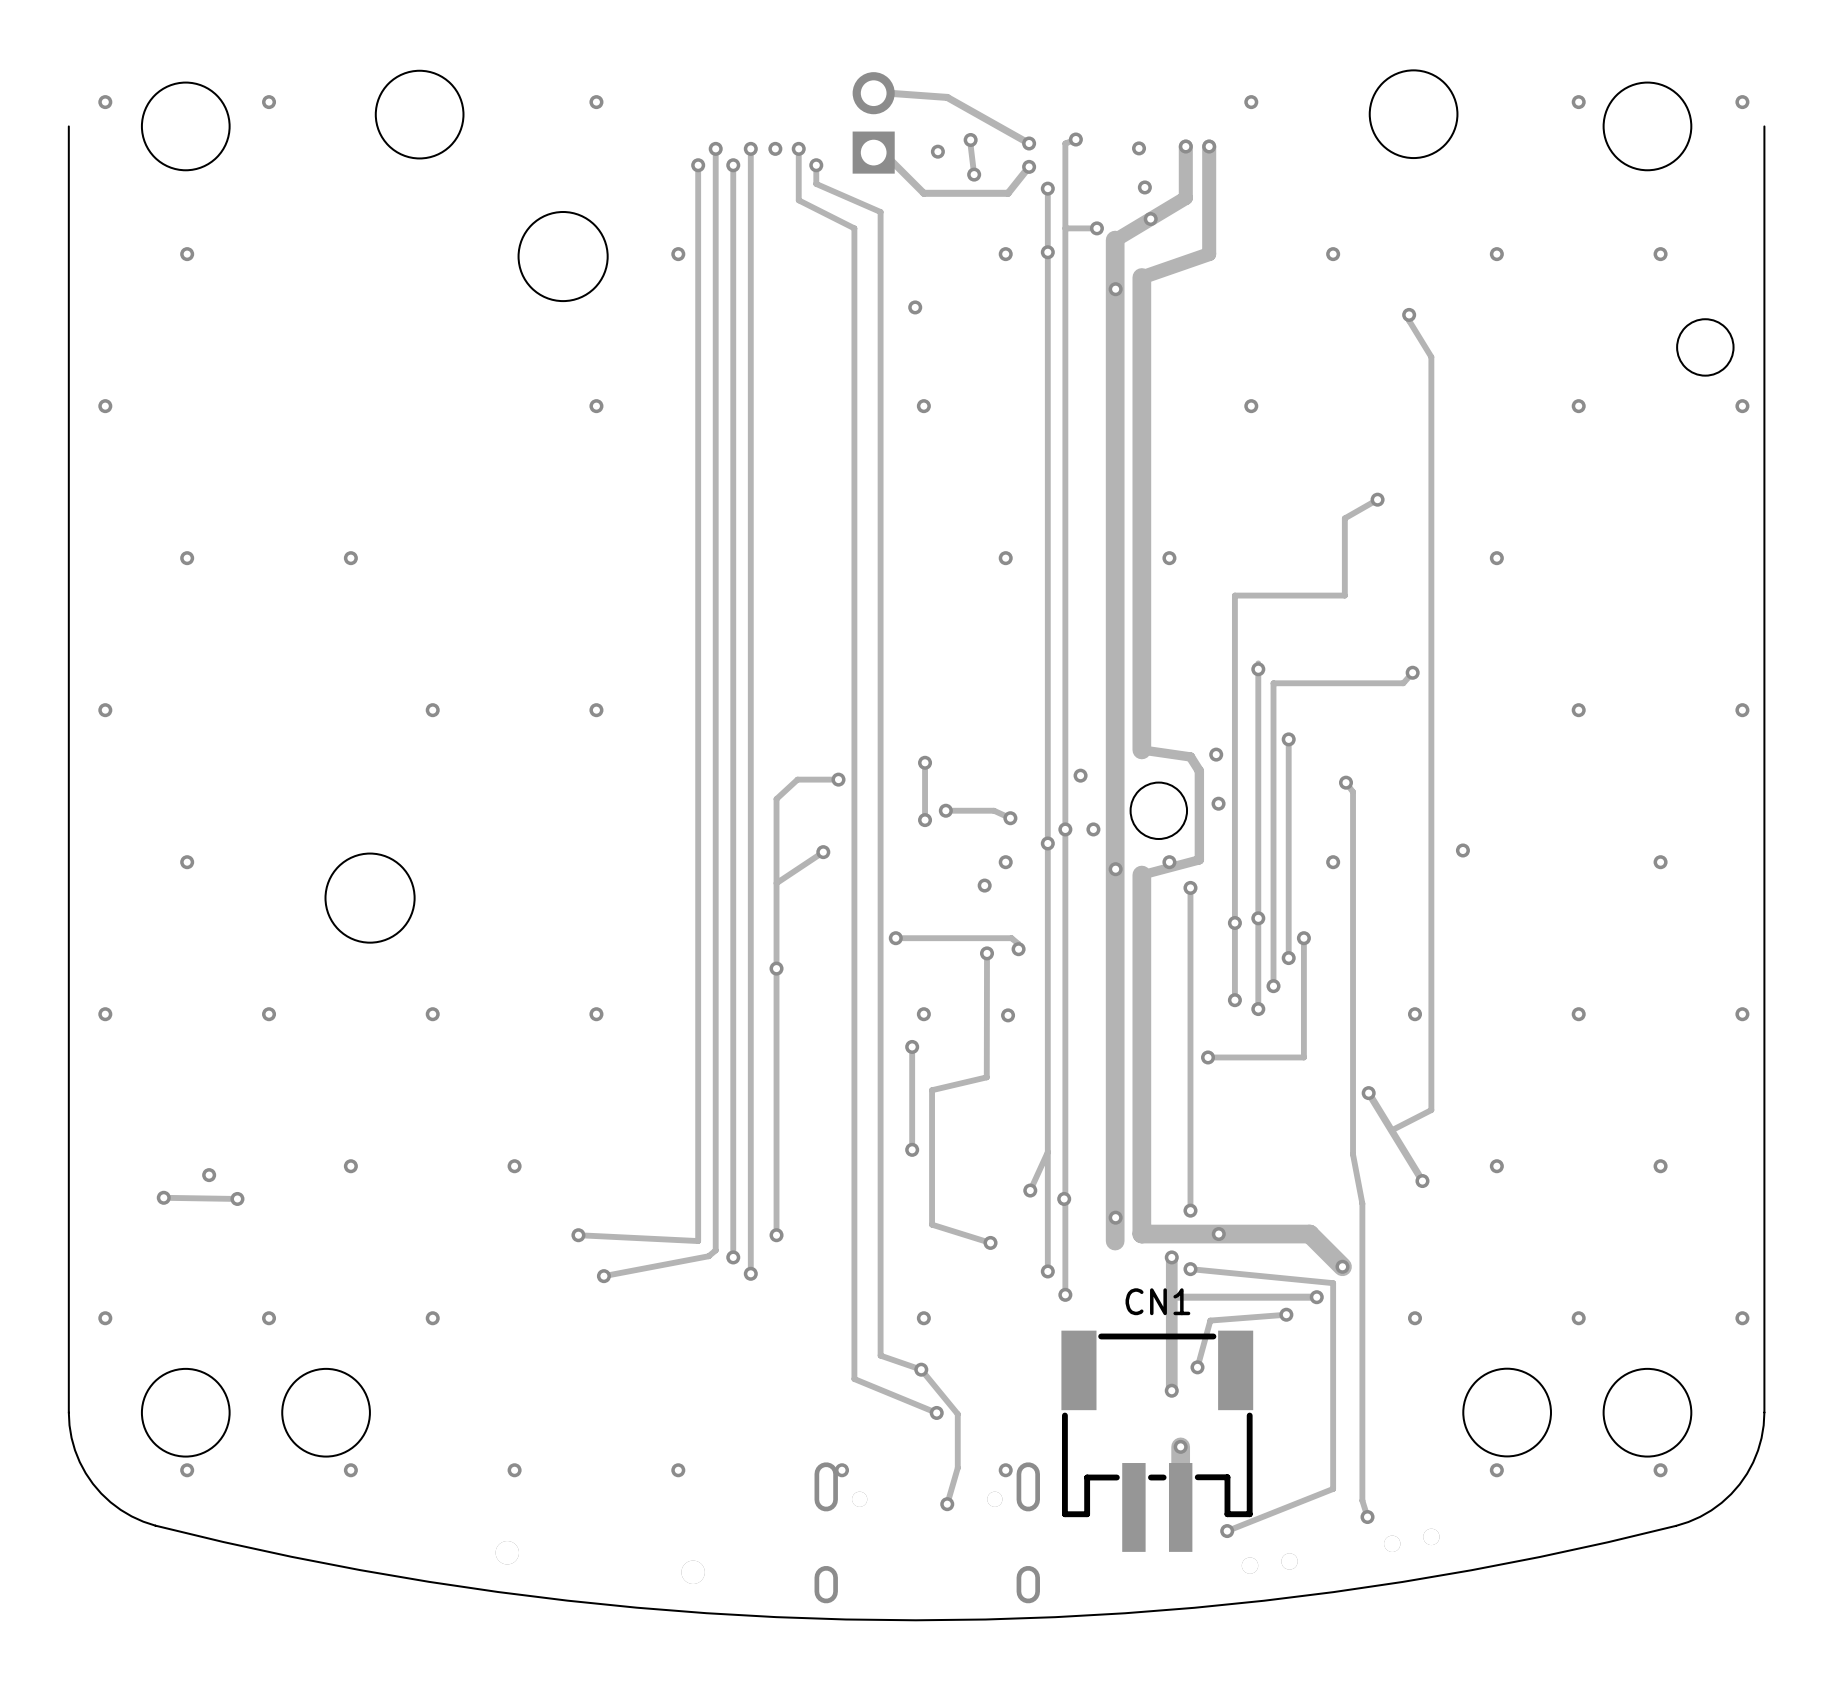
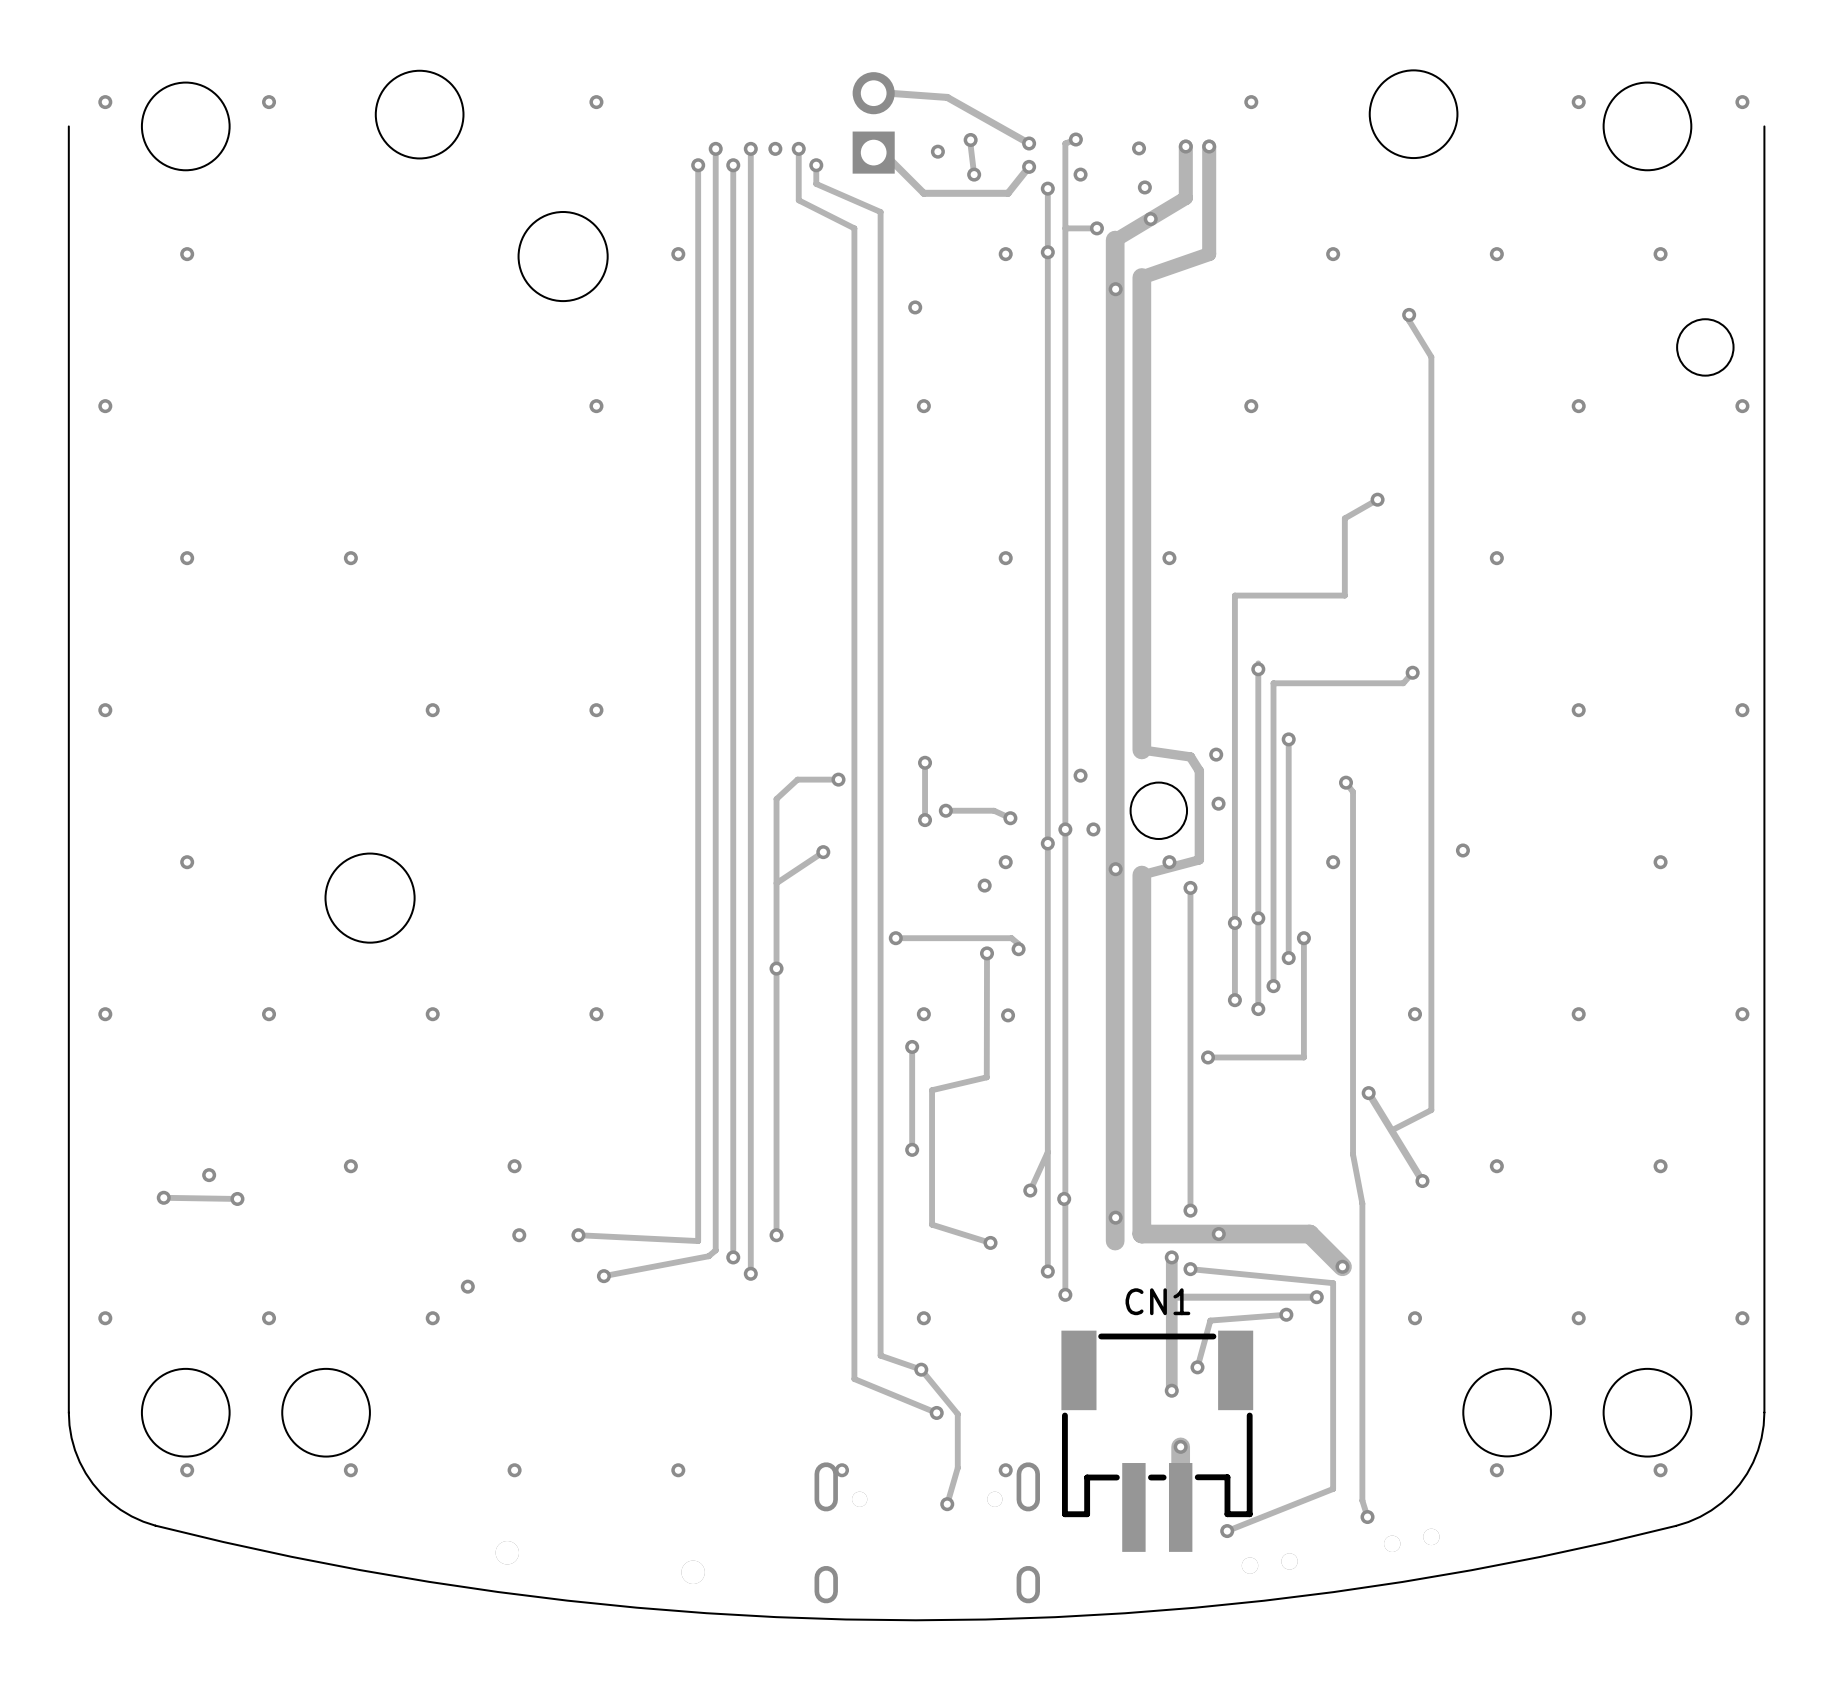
via: none -> (1080, 174)
via: none -> (519, 1235)
via: none -> (467, 1286)

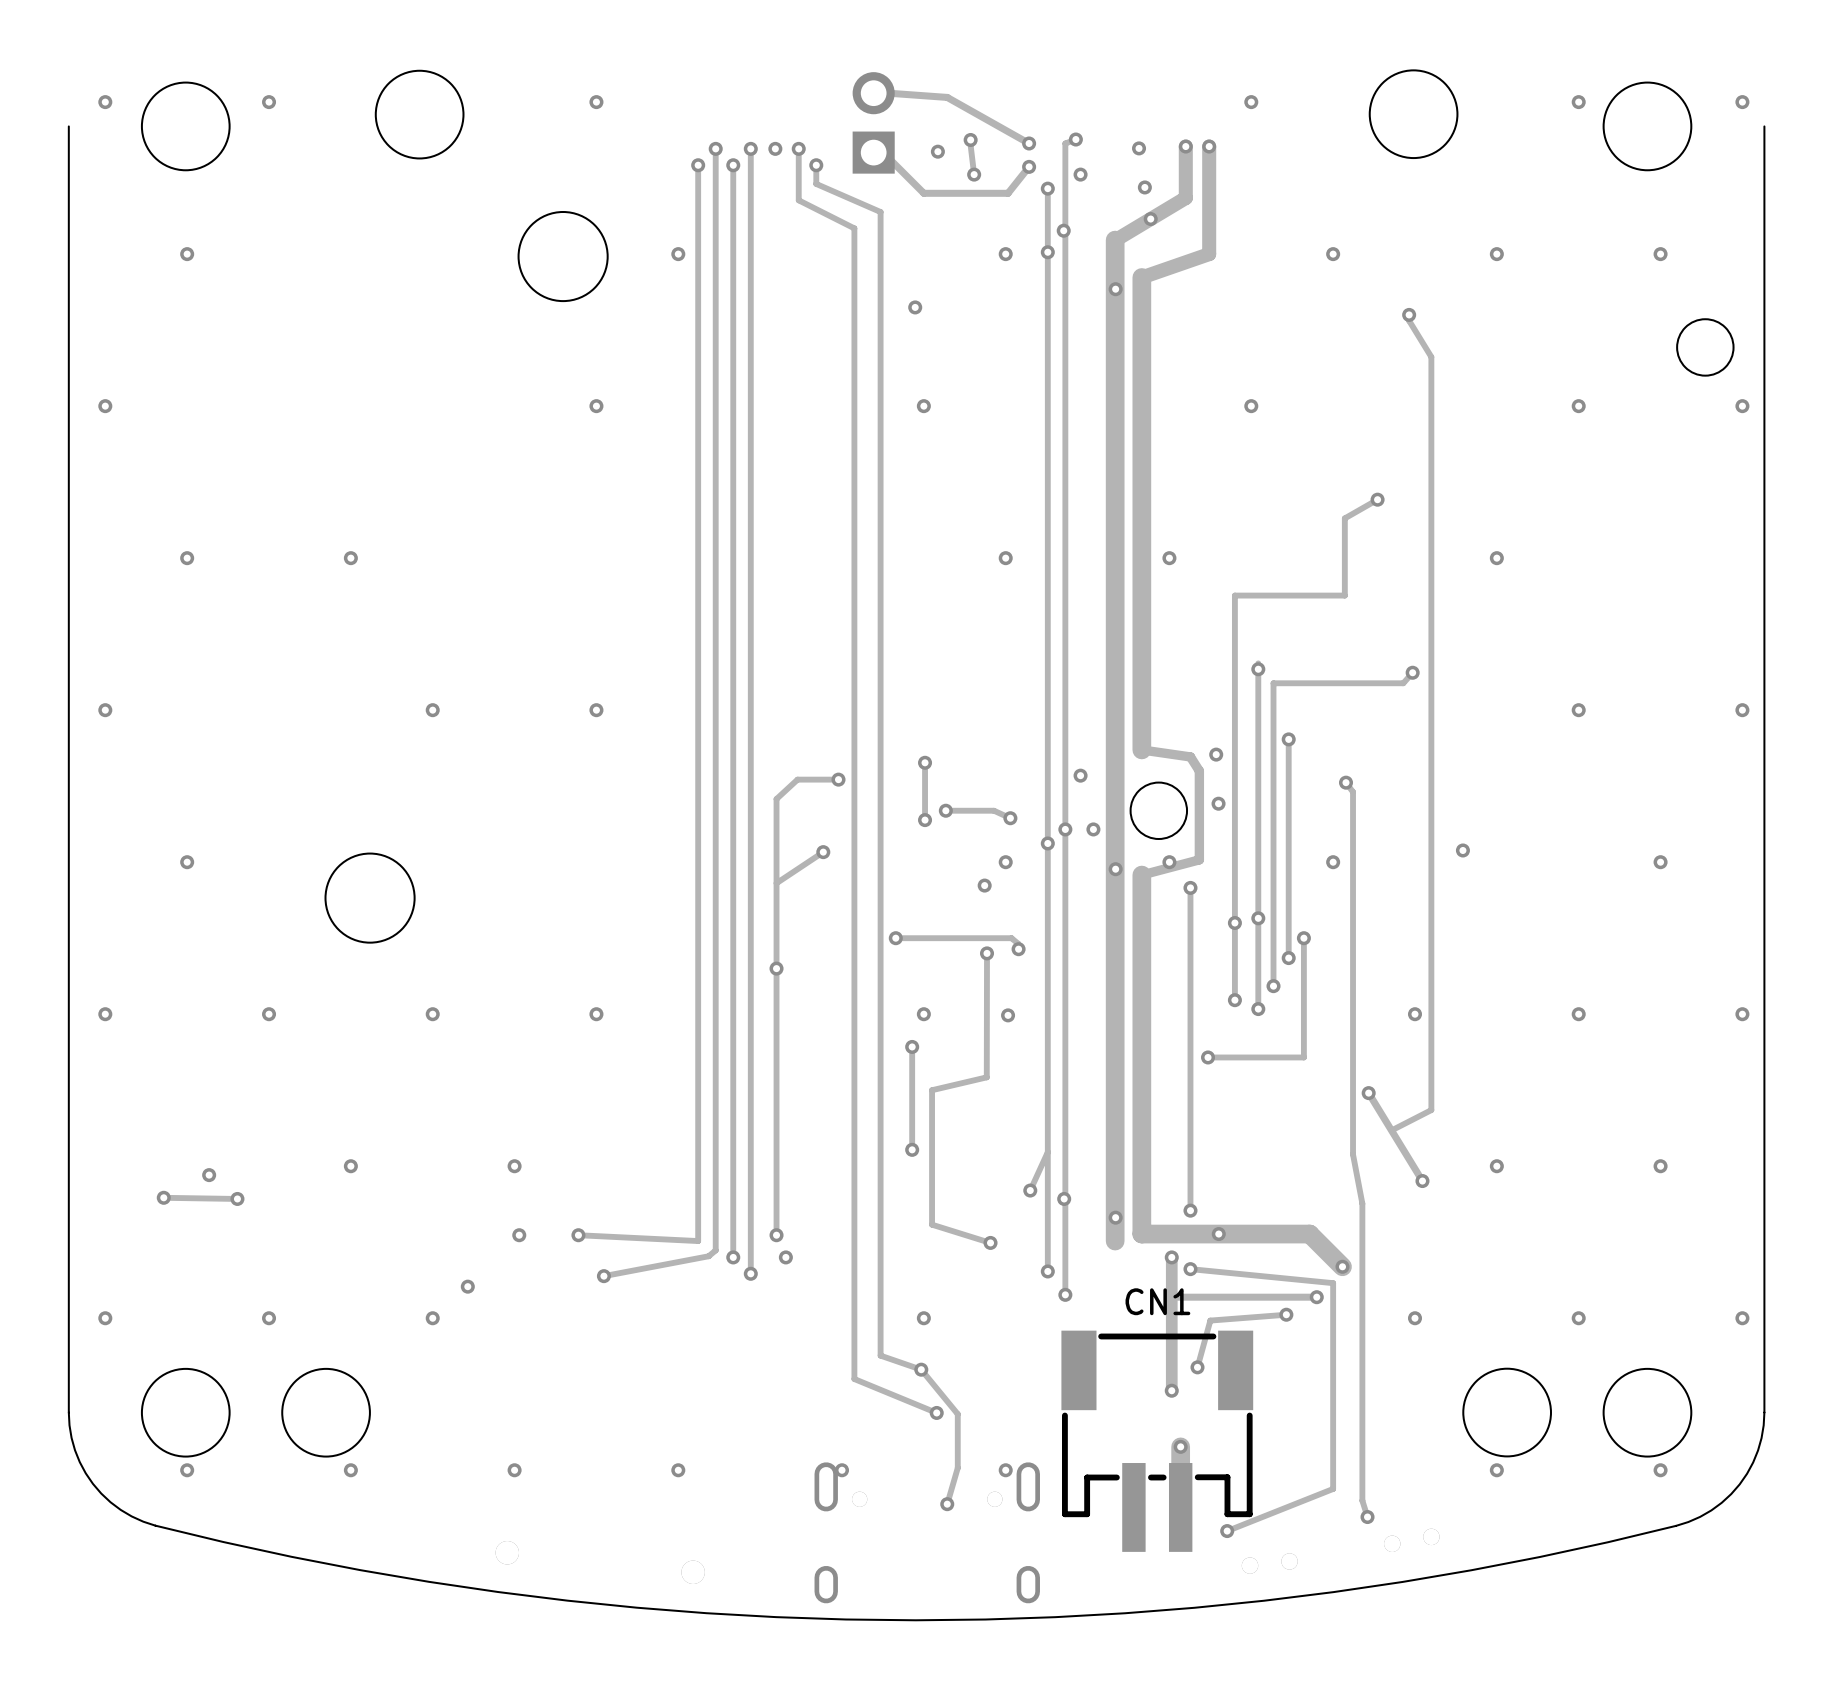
track: (1096, 228) (1065, 228) -> none
via position: (1096, 228) -> (1063, 230)
via: none -> (785, 1257)

